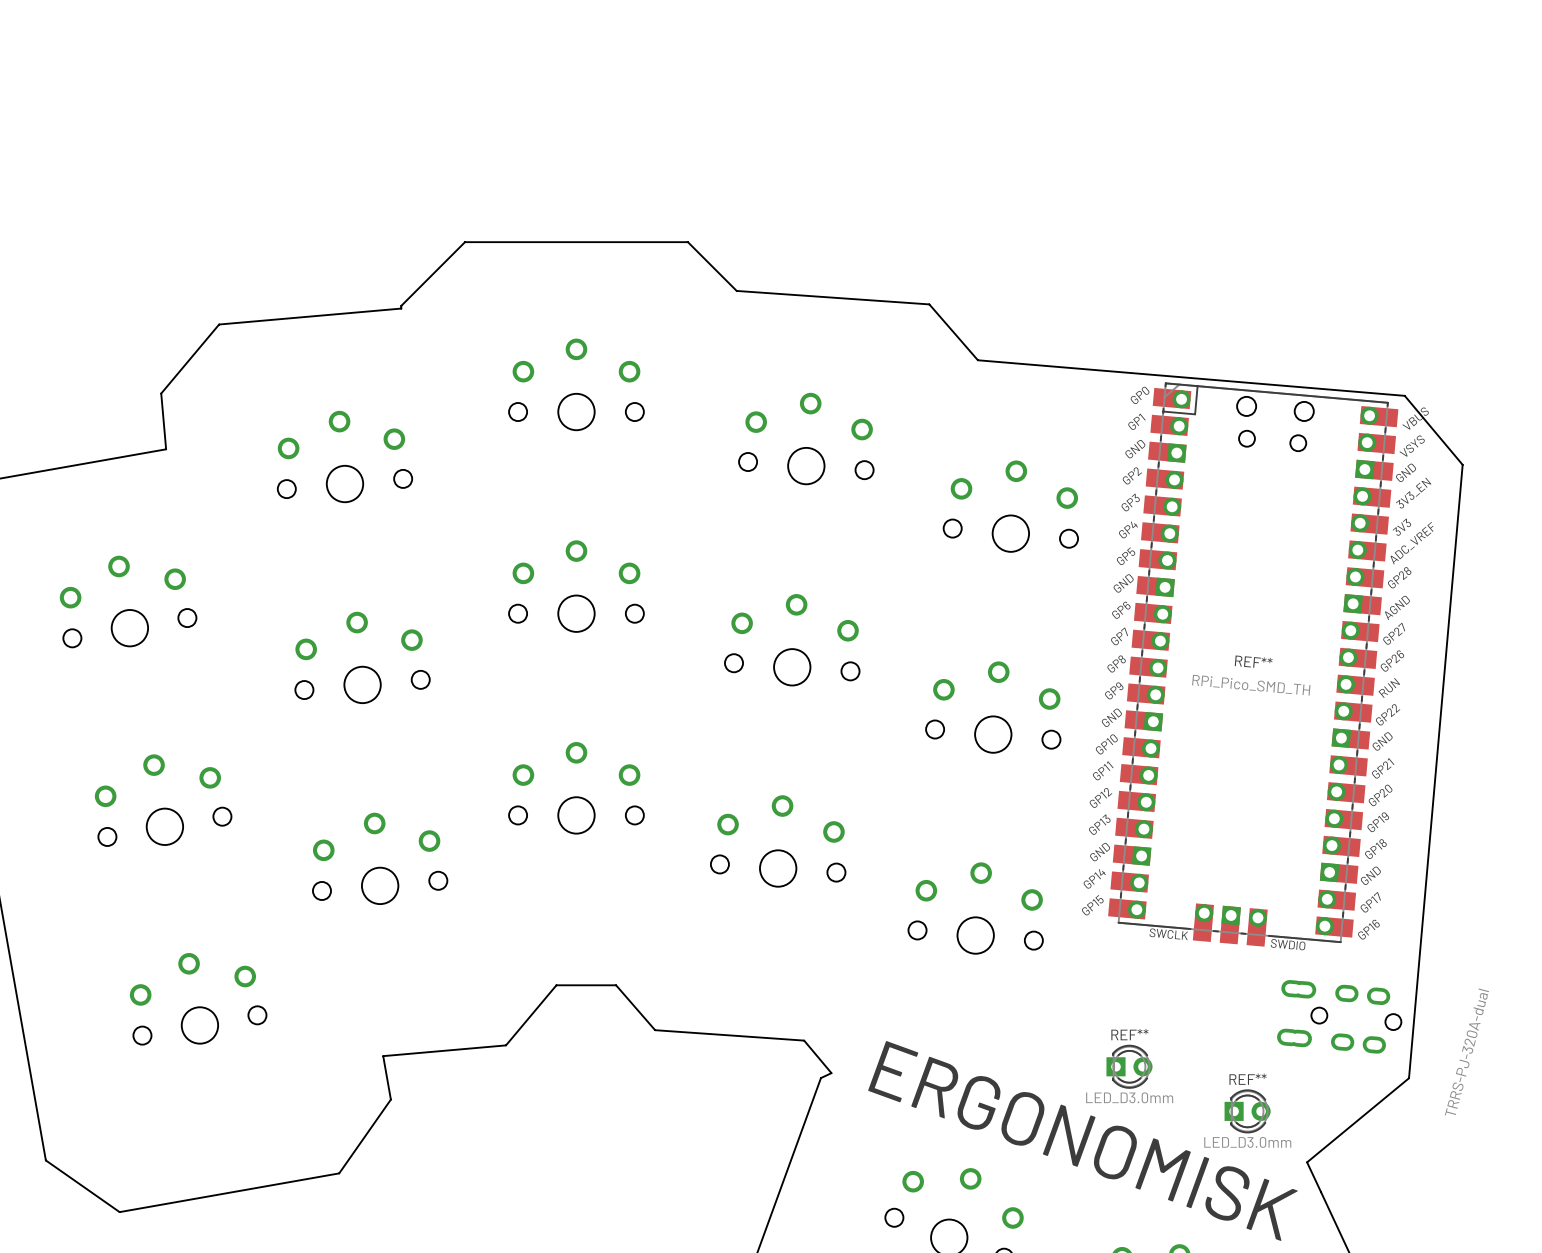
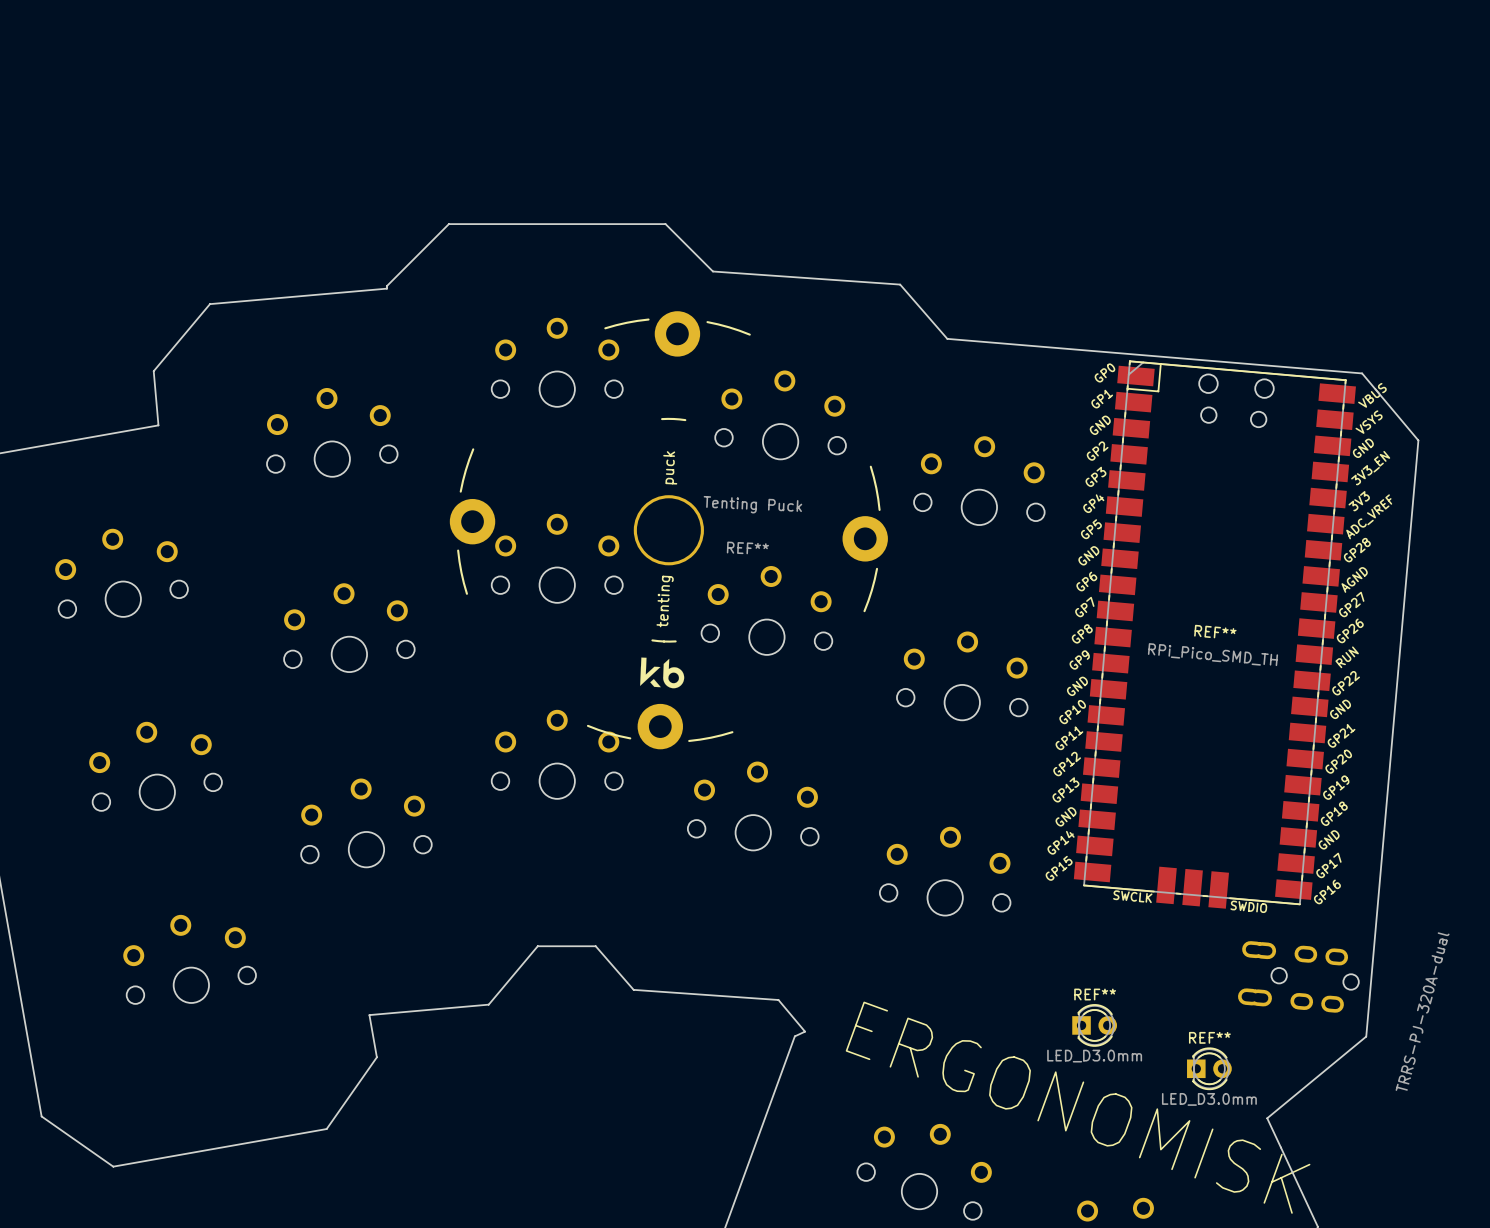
REF** footprint: [1108, 382, 1399, 947] -> [1073, 360, 1356, 909]
REF**: none -> Tenting Puck (668, 530)

